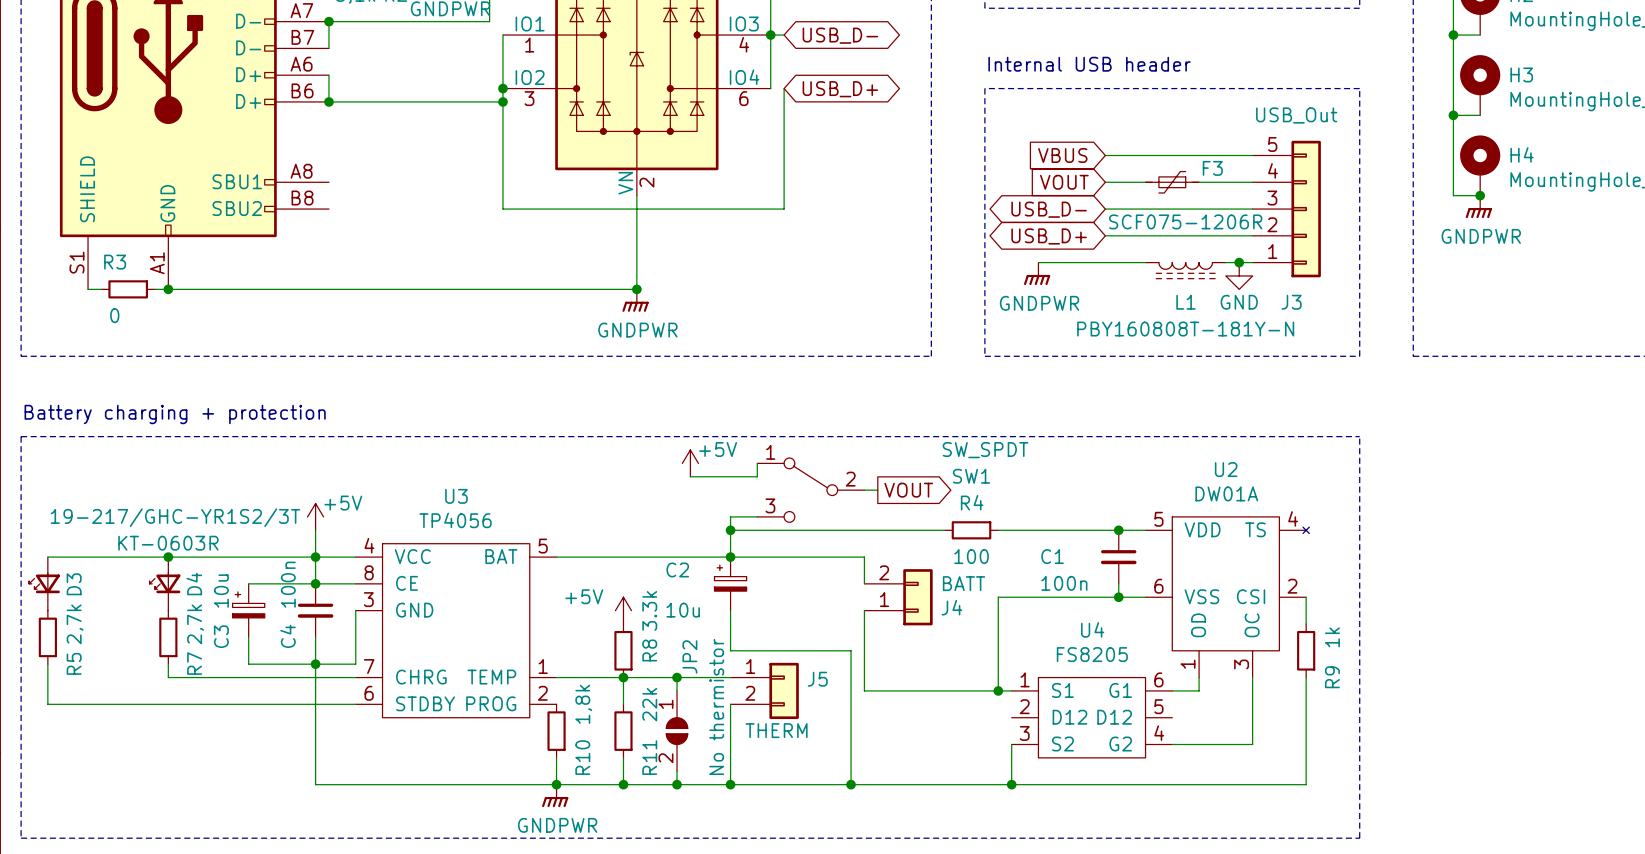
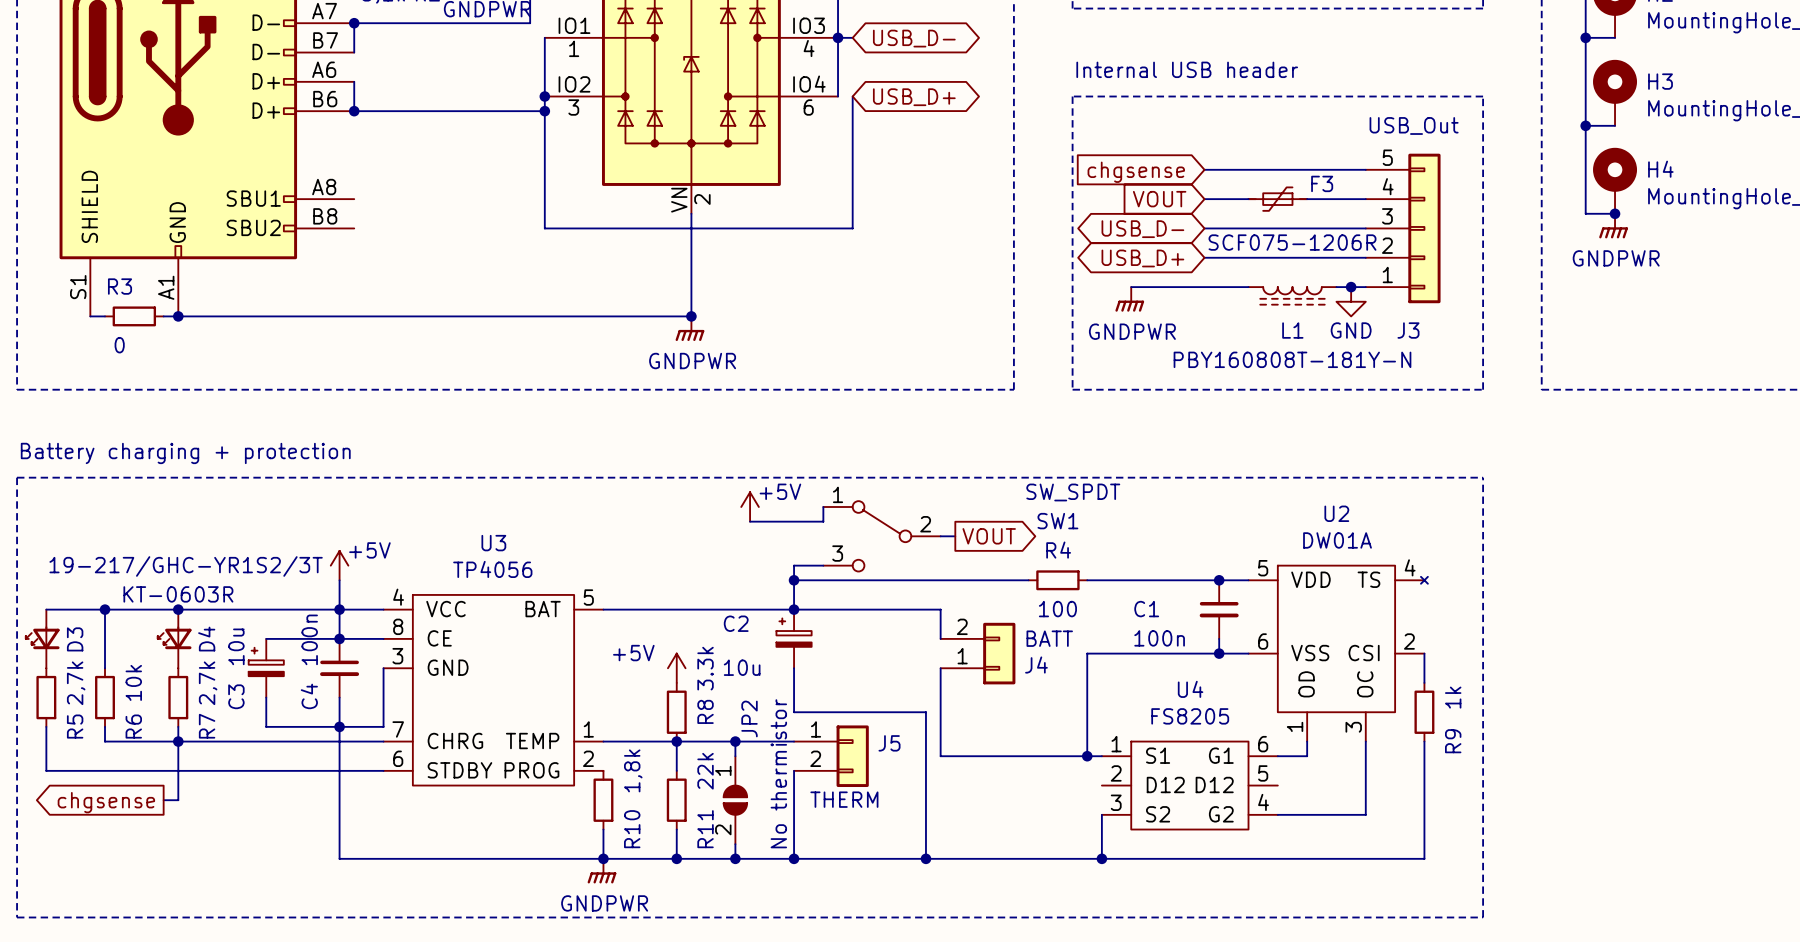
global label: VBUS (1062, 155) -> chgsense (1136, 172)
wire: none -> (105, 609) (105, 668)
junction: none -> (105, 609)
R6: none -> 10k (105, 697)
wire: none -> (105, 726) (105, 741) (178, 741) (178, 800) (163, 800)
junction: none -> (178, 741)
global label: none -> chgsense (106, 802)

